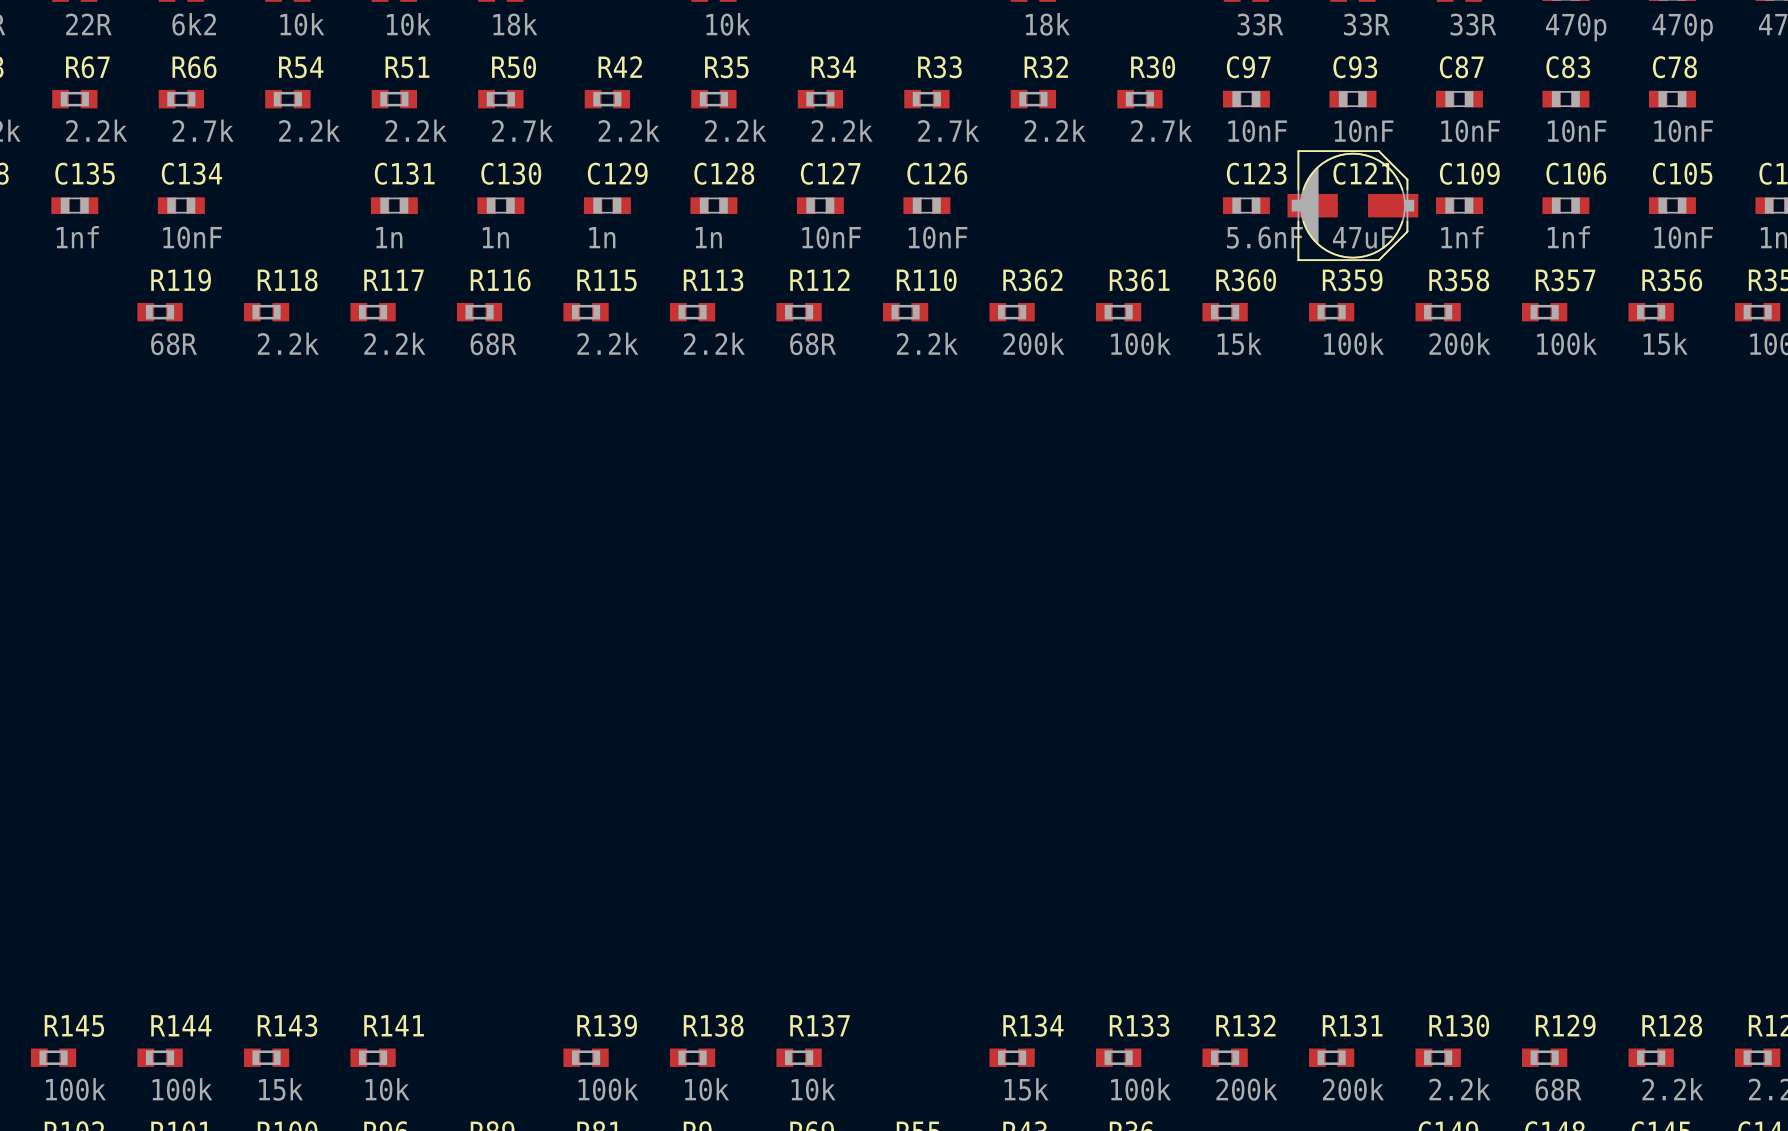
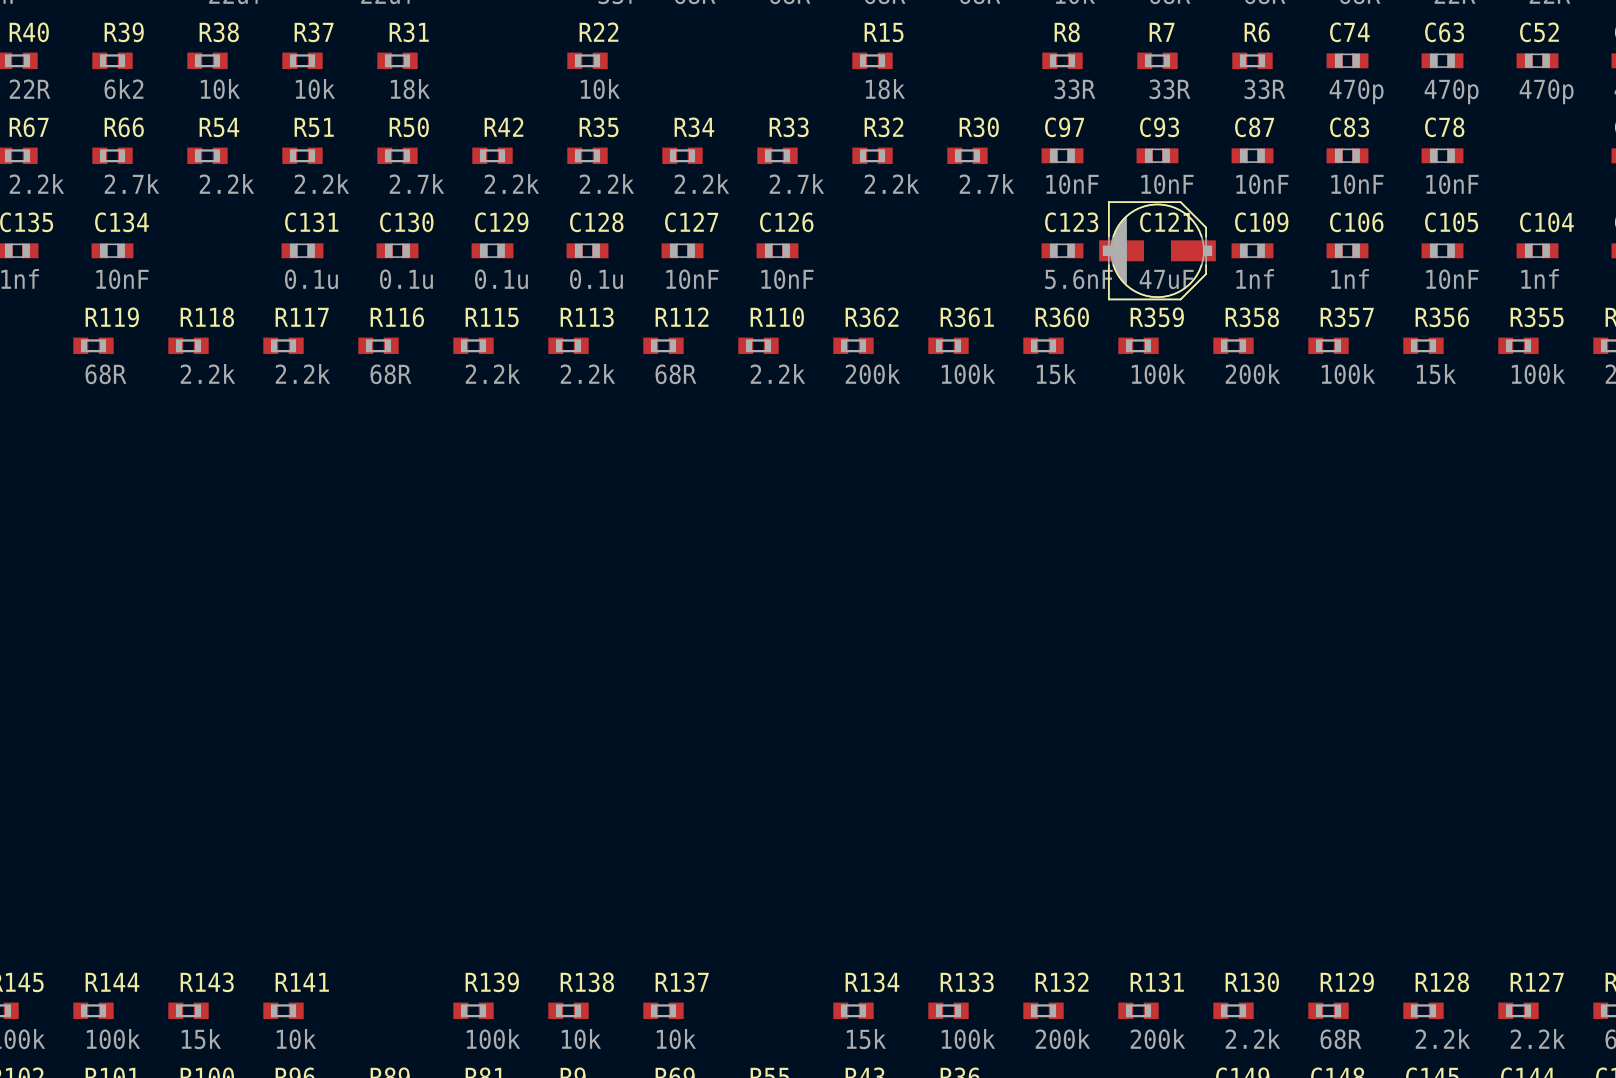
C131 value: 1n (389, 237) -> 0.1u (311, 279)
C130 value: 1n (495, 237) -> 0.1u (406, 279)
C129 value: 1n (602, 237) -> 0.1u (501, 279)
C128 value: 1n (708, 237) -> 0.1u (596, 279)

